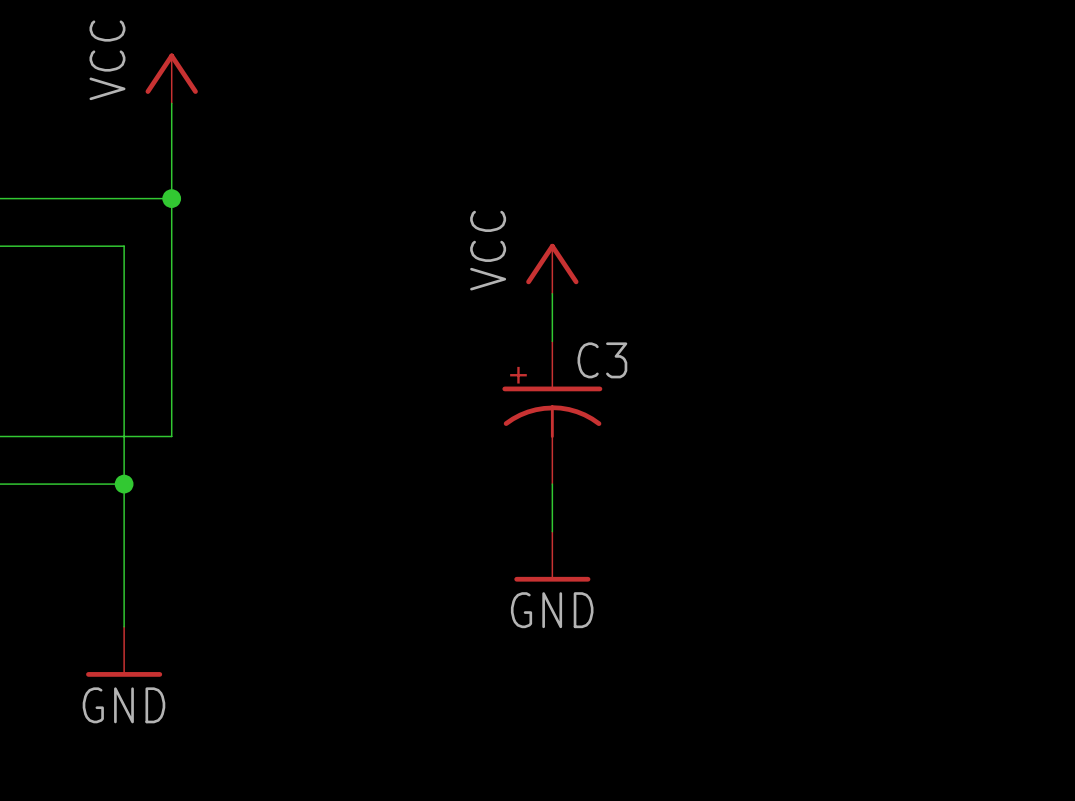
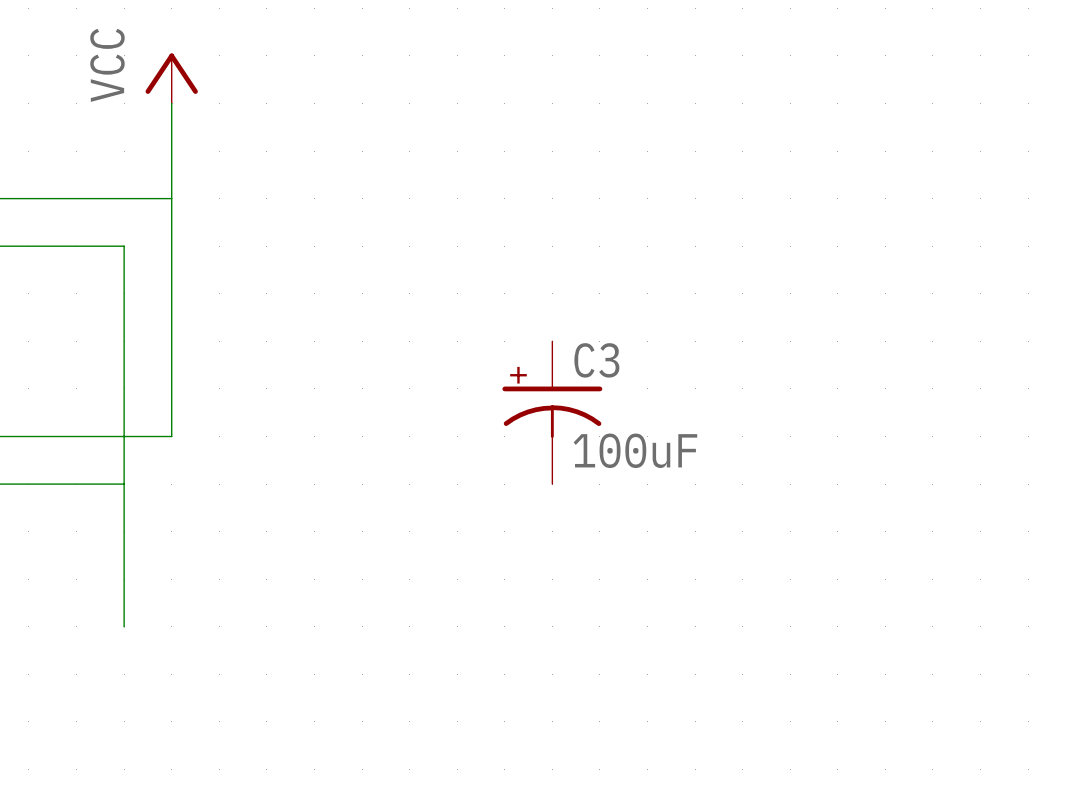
junction: (171, 198) -> none
power symbol: VCC (552, 268) -> none
wire: (552, 293) (552, 341) -> none
C3 value: none -> 100uF (635, 450)
junction: (124, 484) -> none
wire: (552, 484) (552, 531) -> none
power symbol: GND (552, 556) -> none
power symbol: GND (124, 651) -> none

